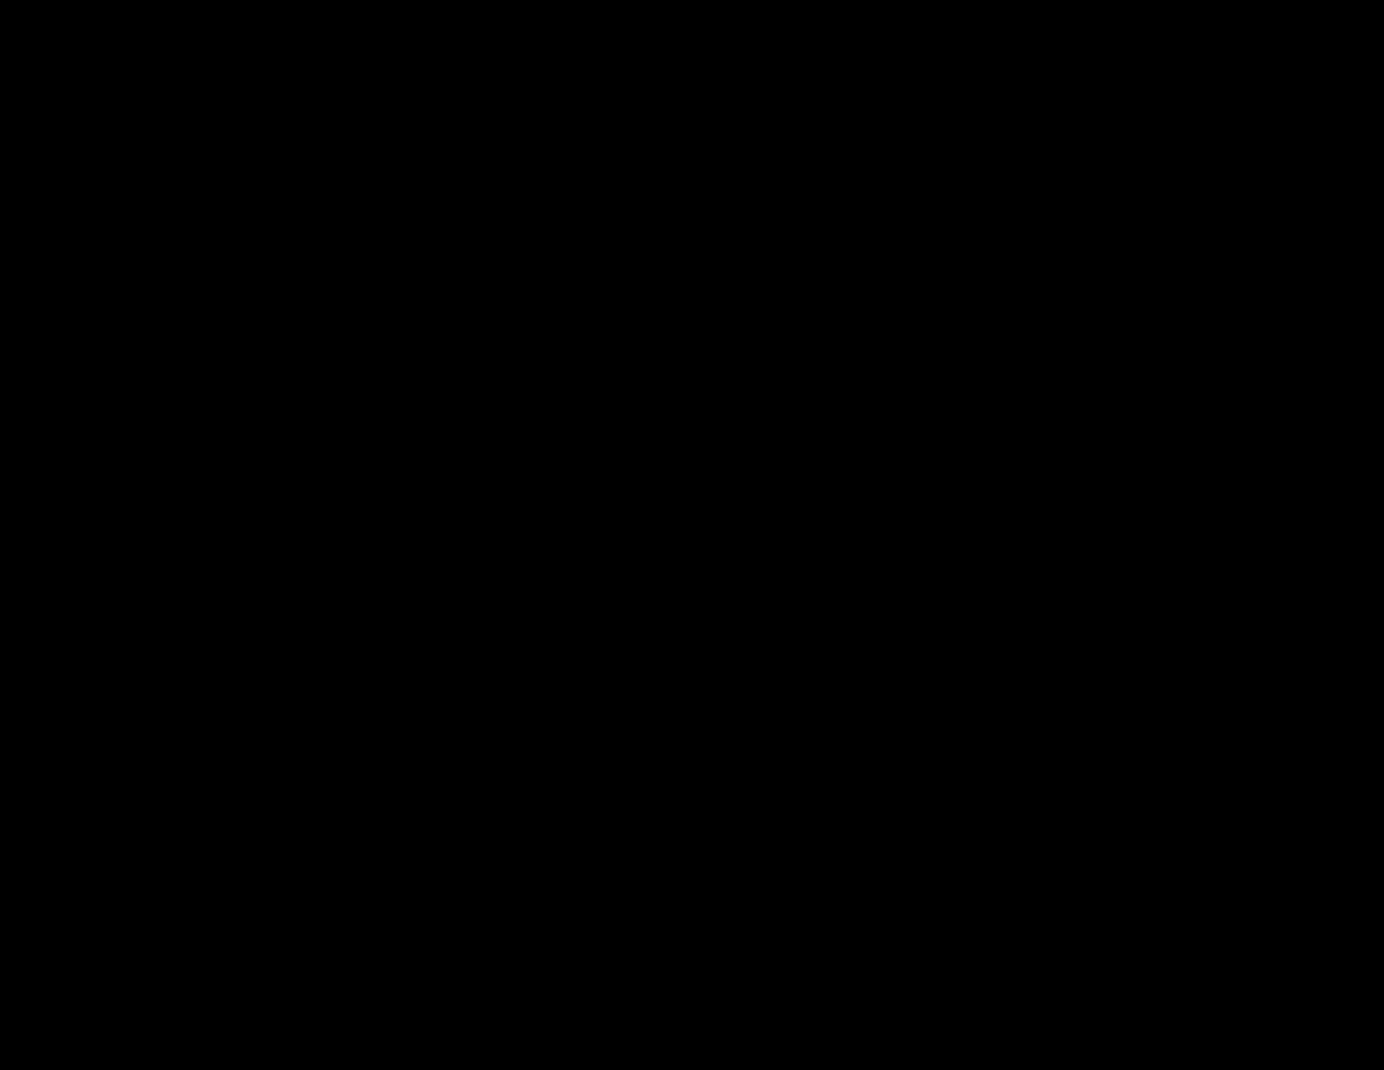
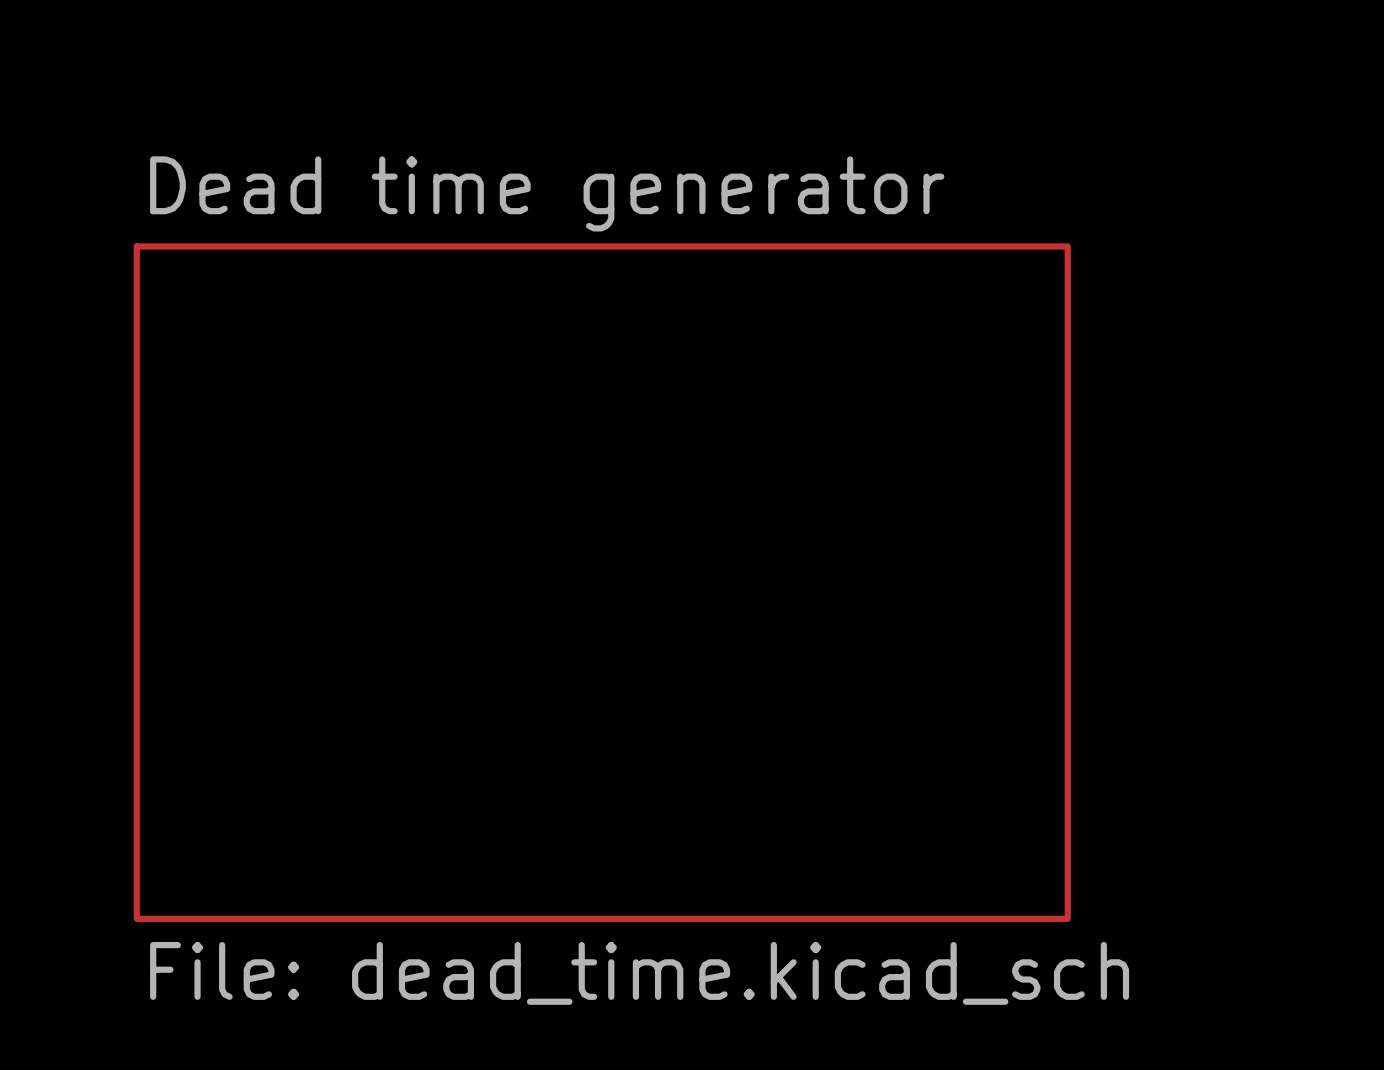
sheet Dead time generator: none -> File: dead_time.kicad_sch (602, 582)

